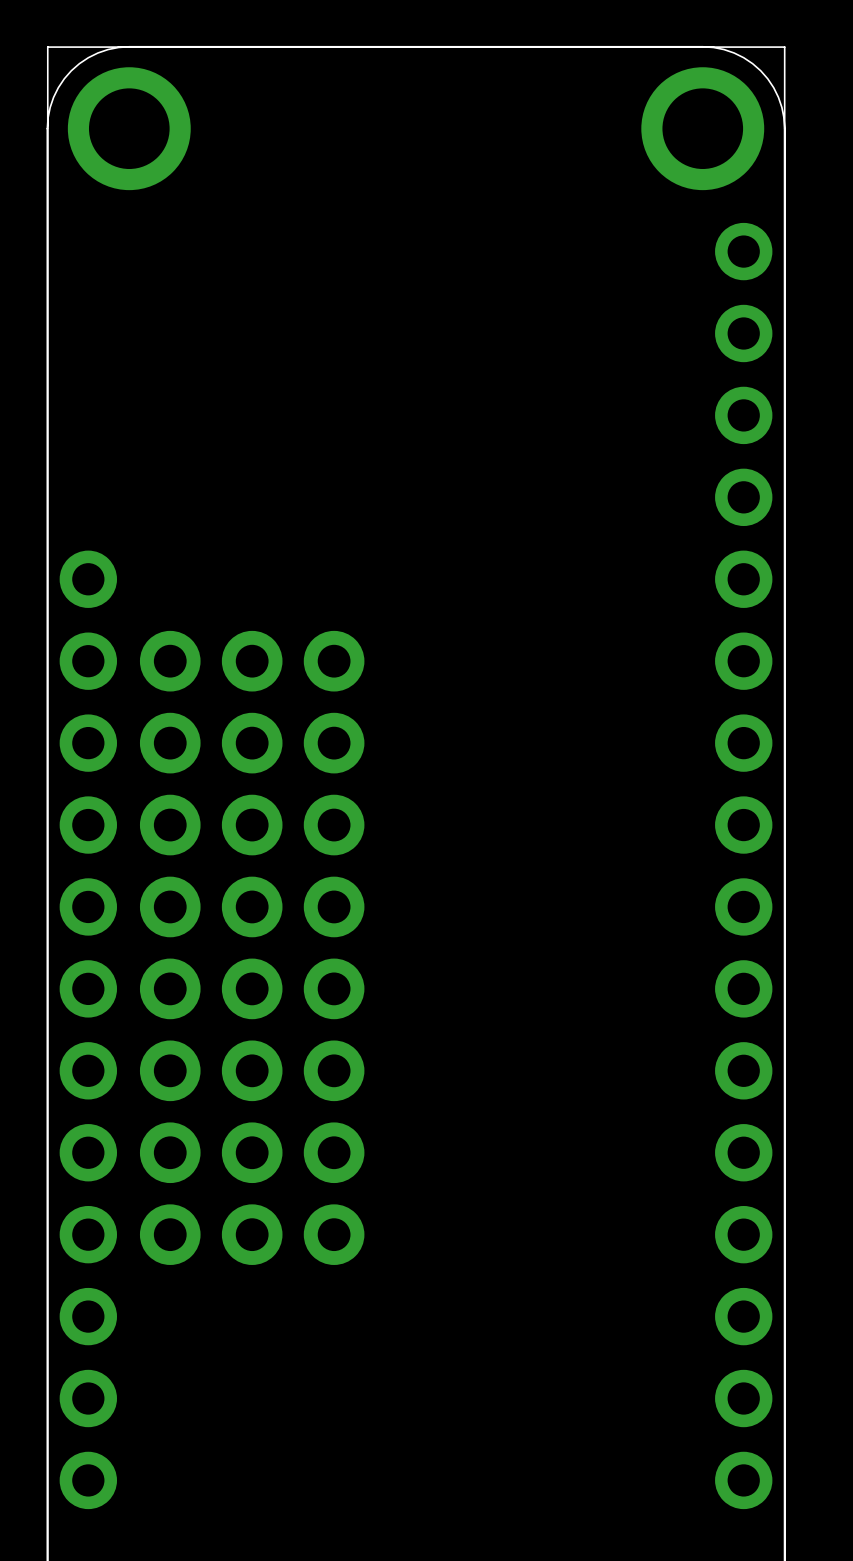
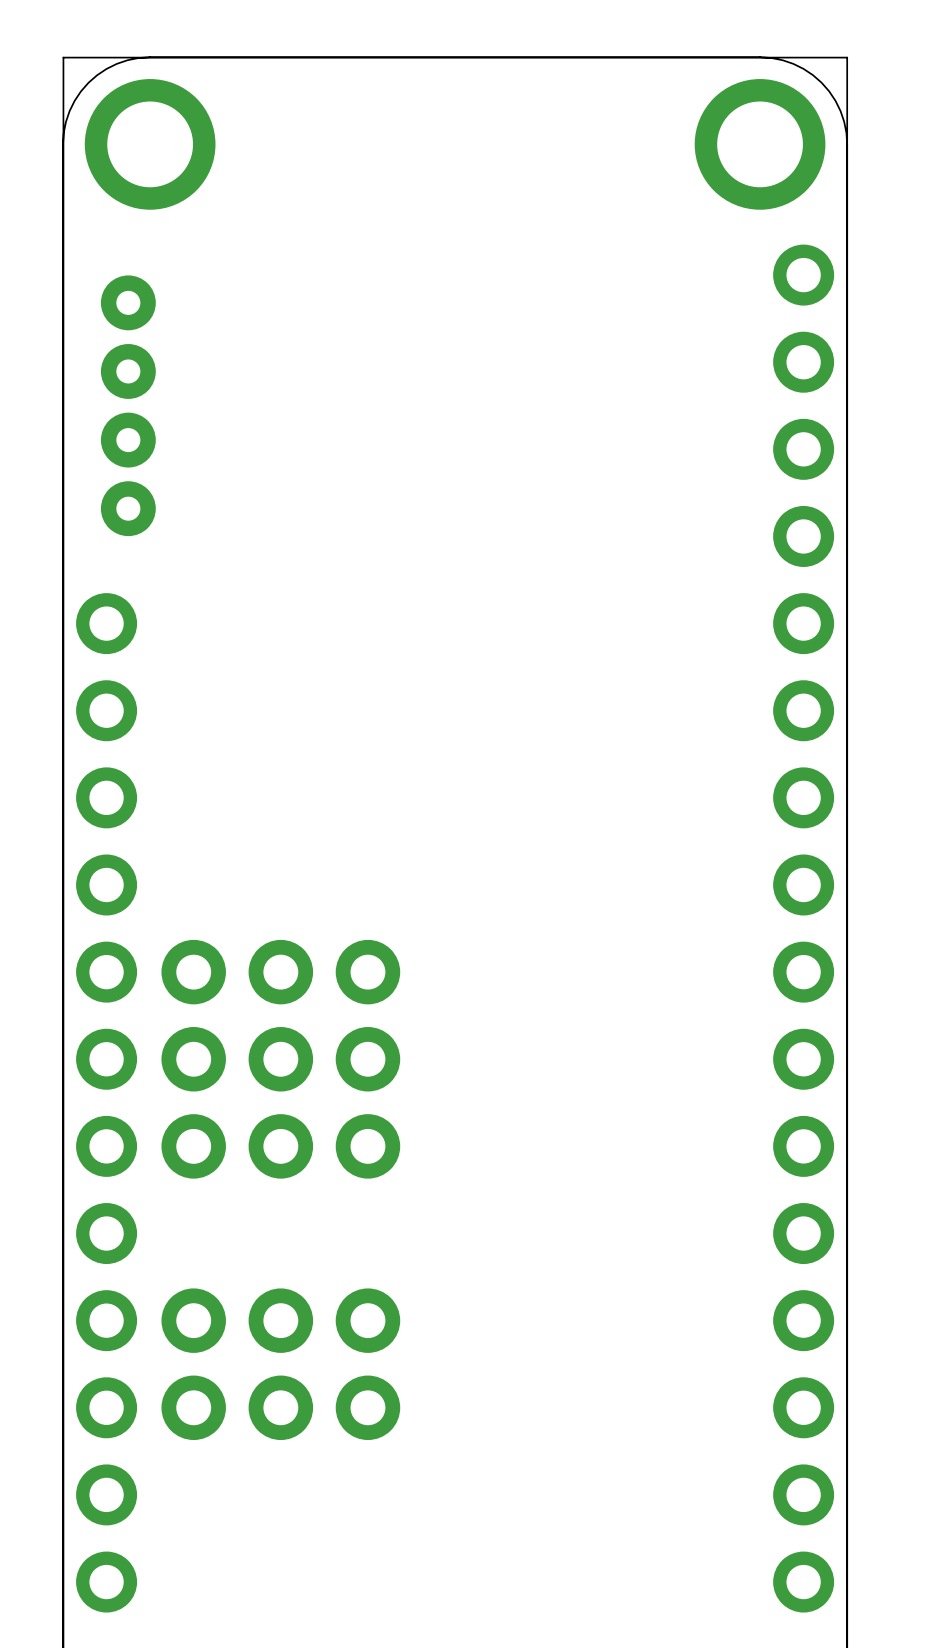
part: none -> (128, 405)
part: (170, 743) -> none
part: (252, 743) -> none
part: (334, 743) -> none
part: (170, 1193) -> none
part: (252, 1193) -> none
part: (334, 1193) -> none
part: none -> (193, 1364)
part: none -> (280, 1364)
part: none -> (367, 1364)

